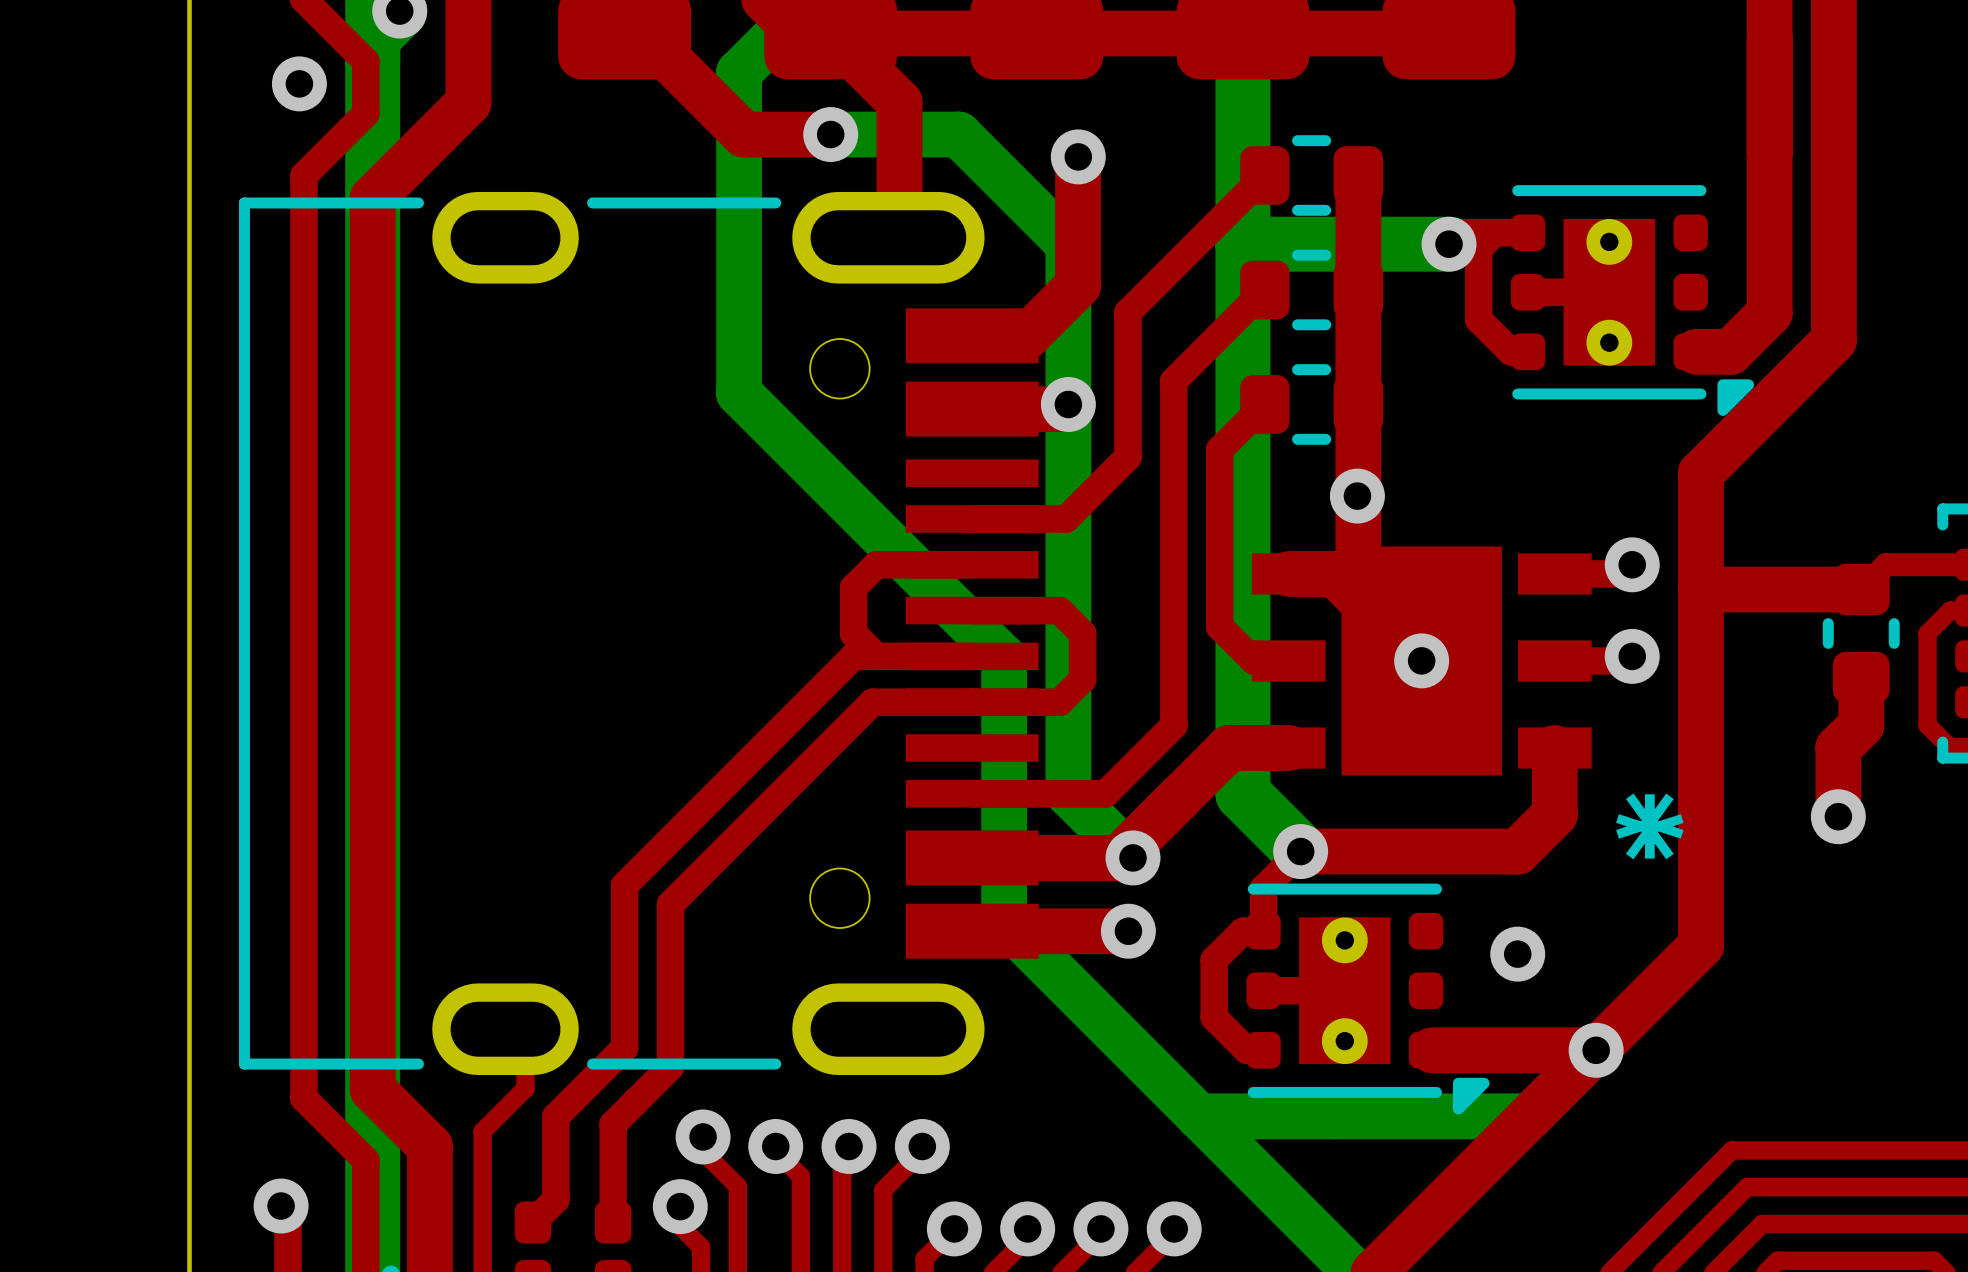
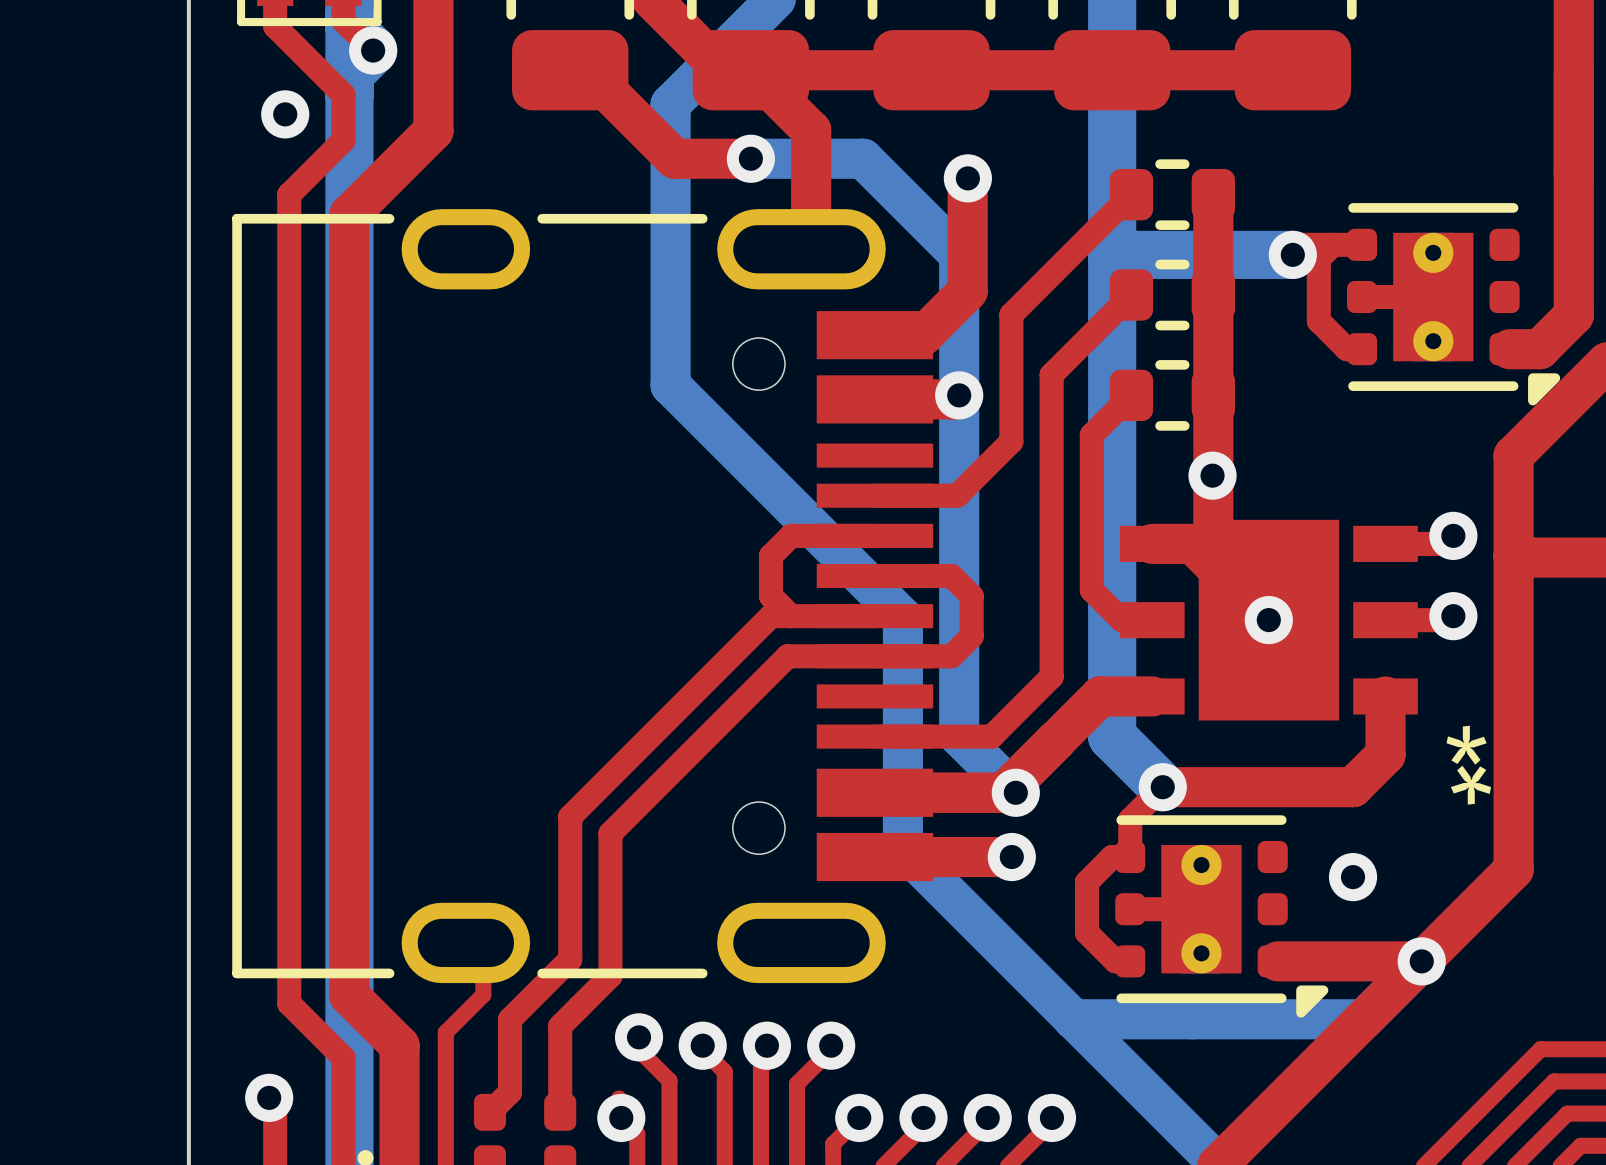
via position: (680, 1206) -> (621, 1117)

